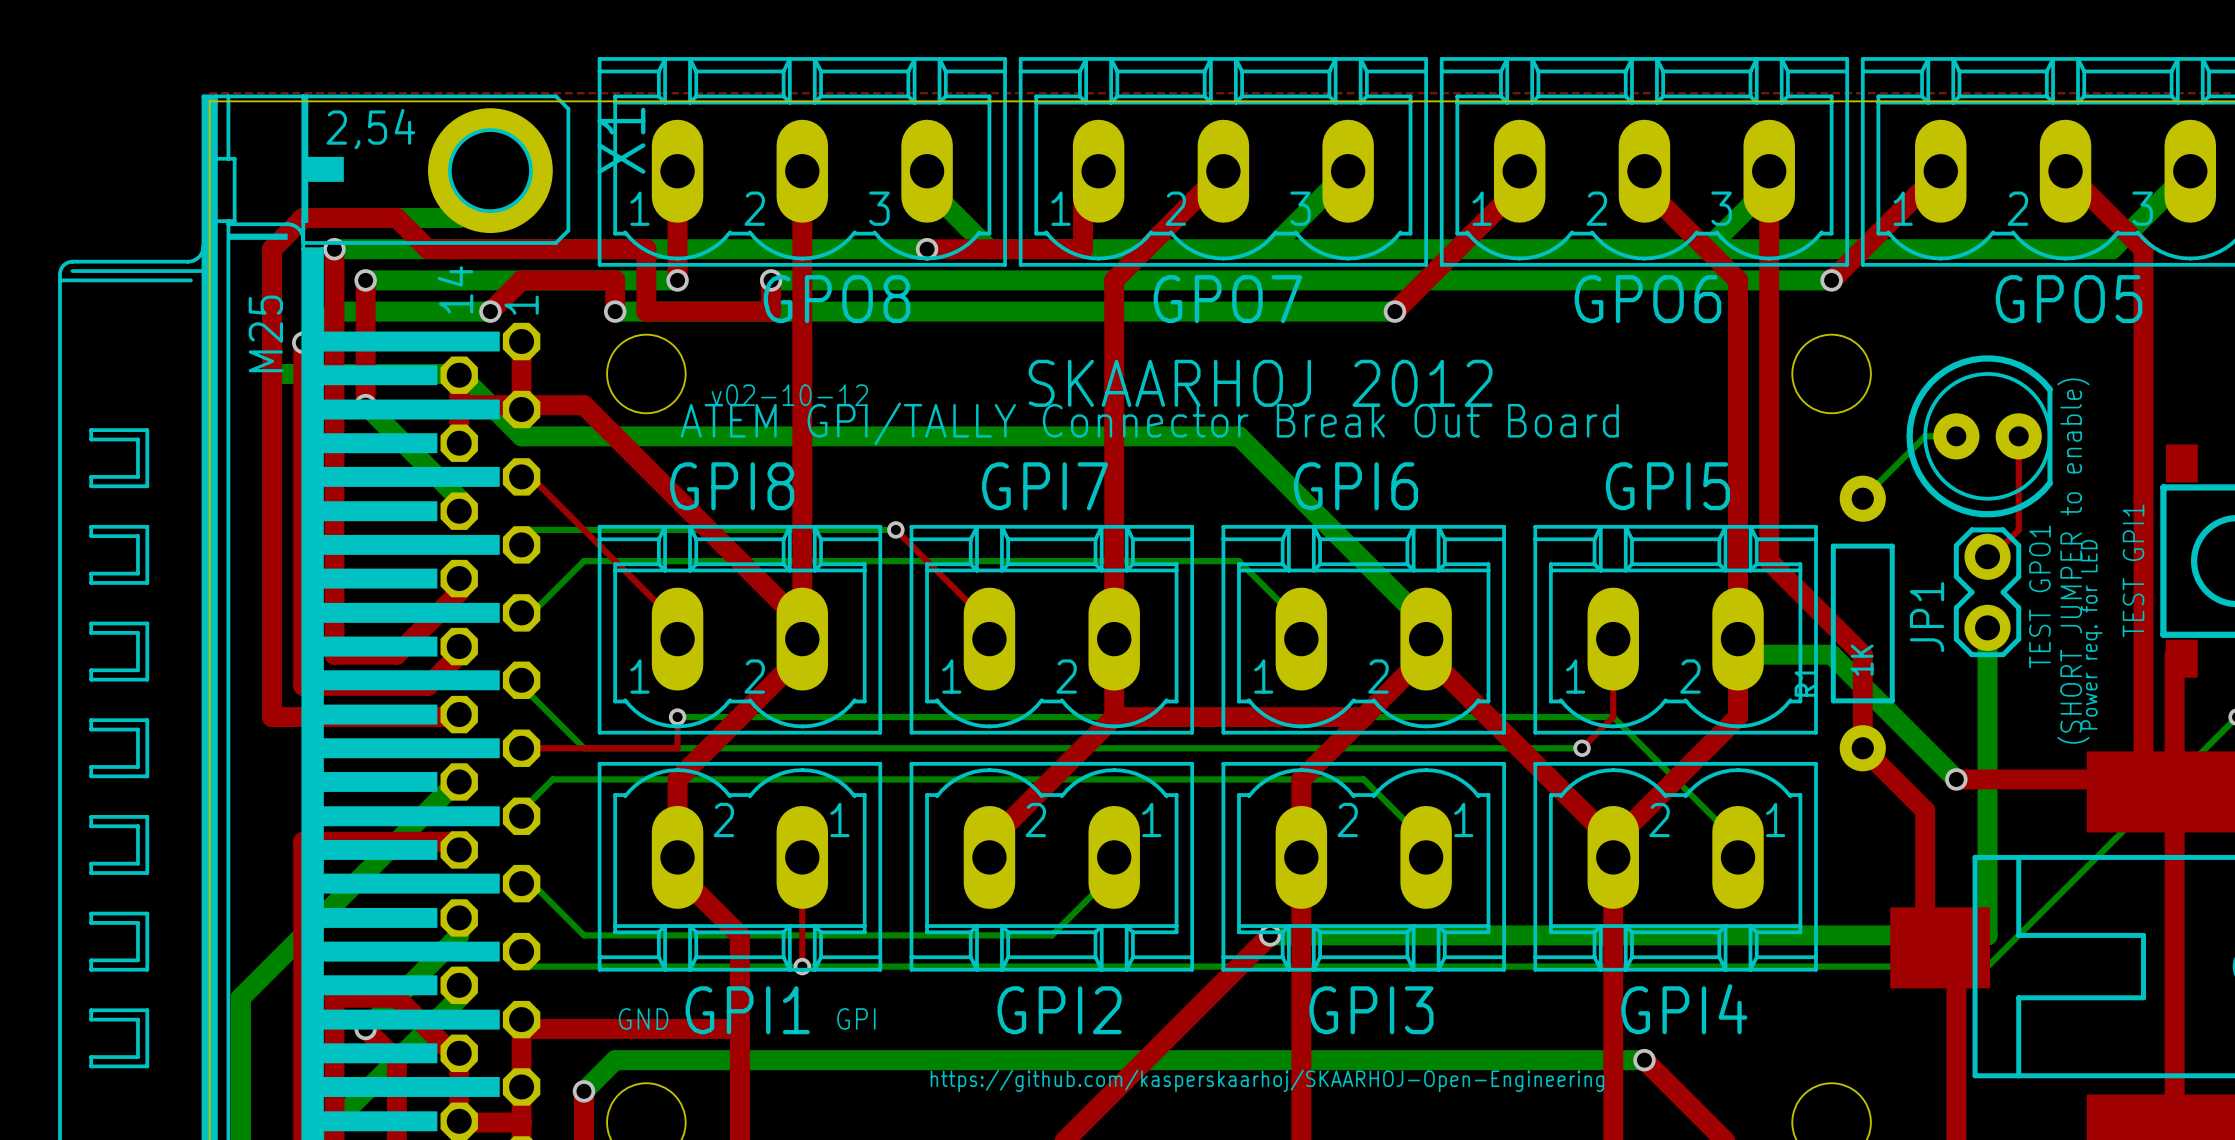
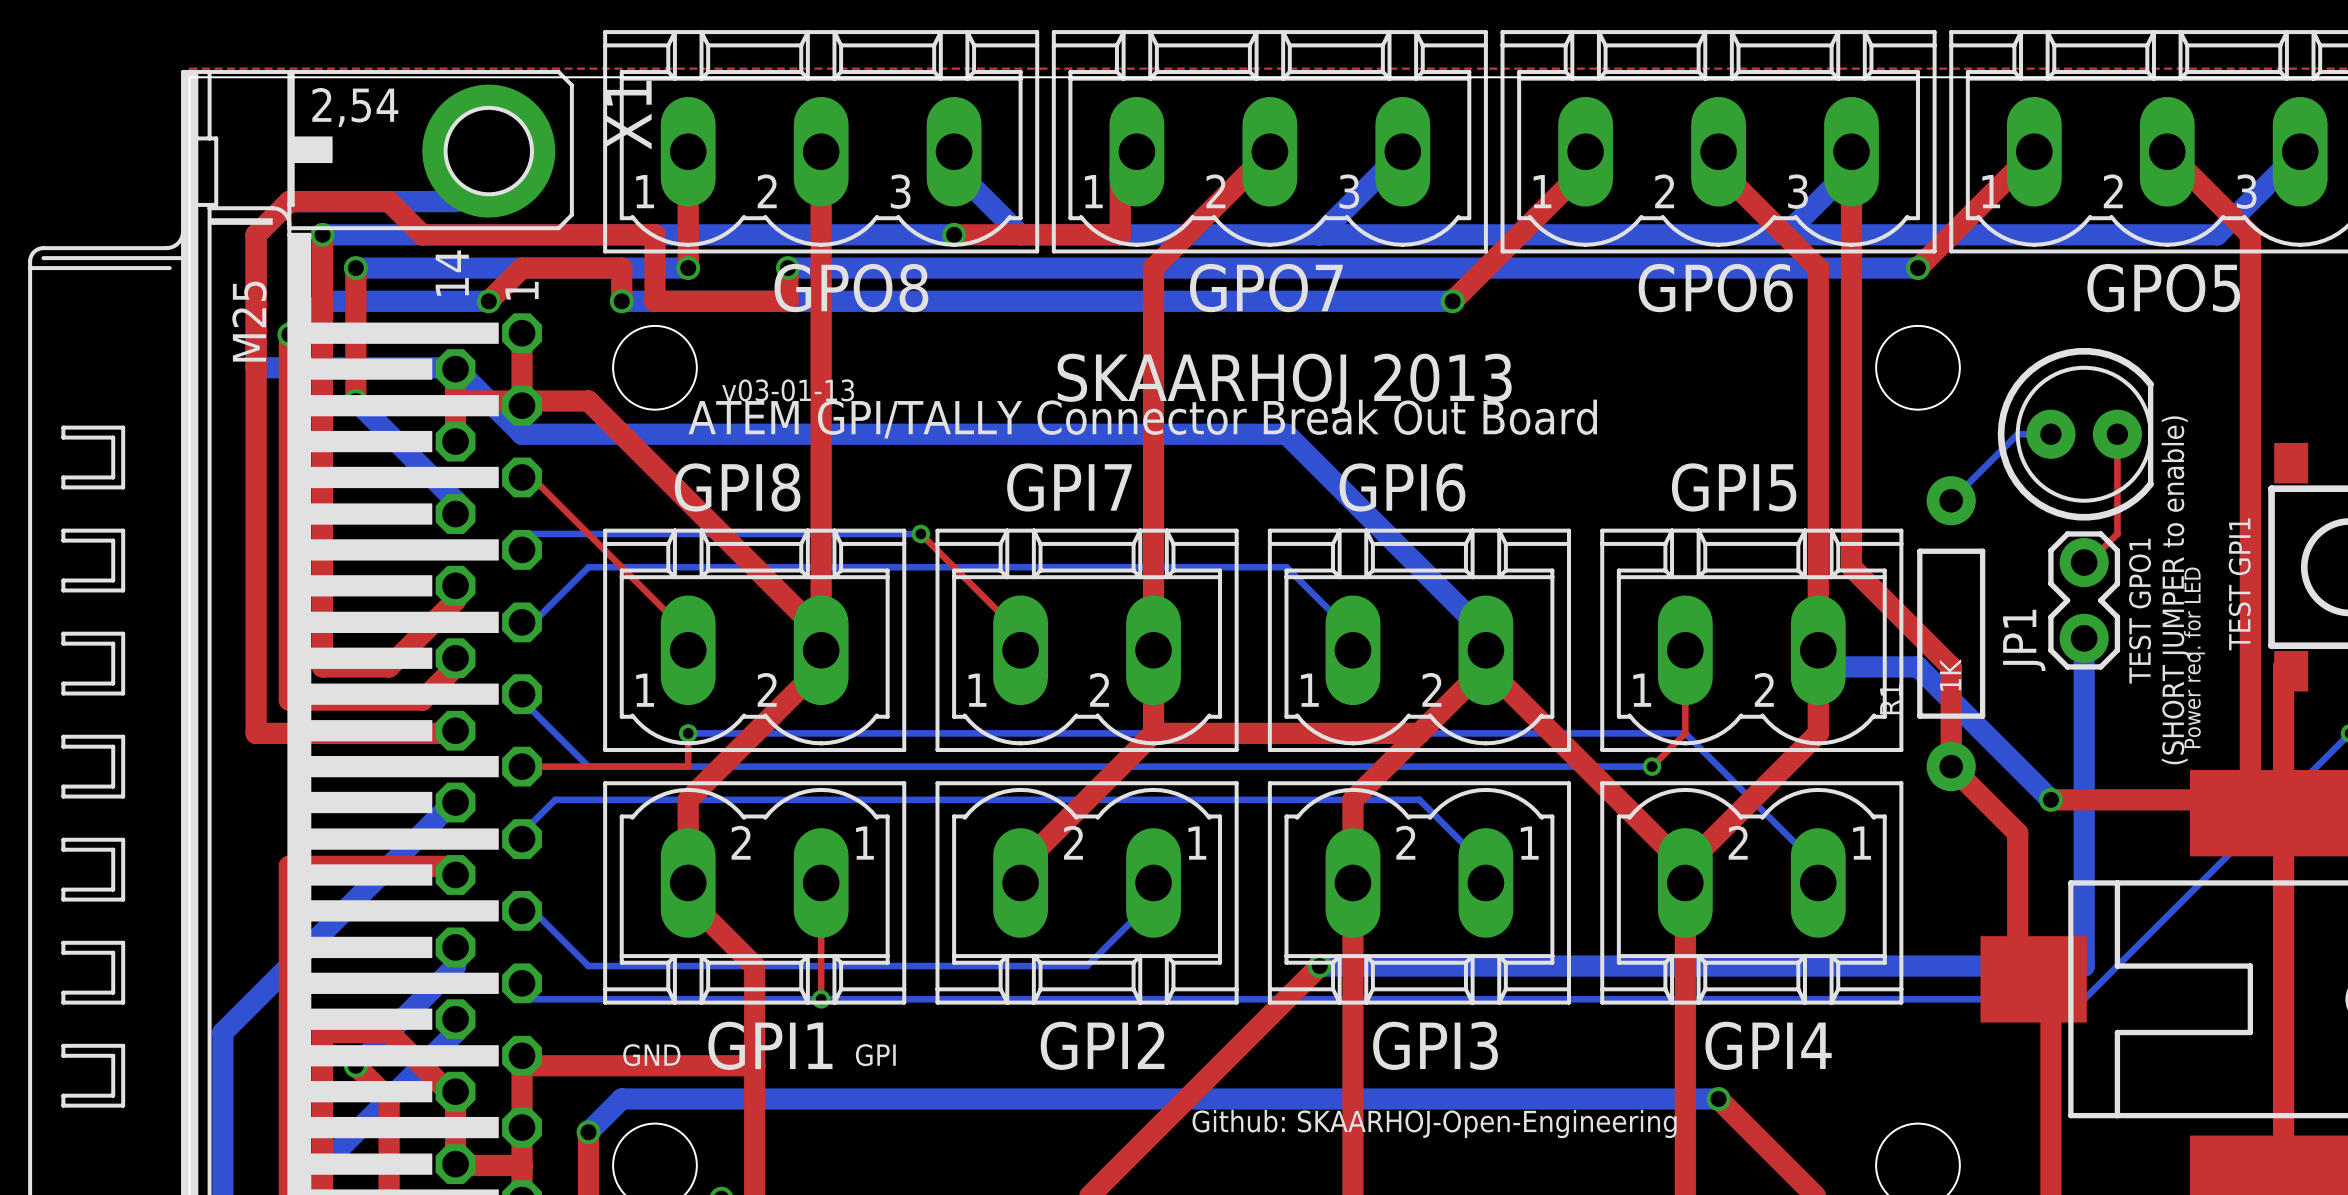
text: SKAARHOJ 2012 (1260, 383) -> SKAARHOJ 2013 (1284, 383)
text: v02-10-12 (789, 395) -> v03-01-13 (788, 390)
text: https://github.com/kasperskaarhoj/SKAARHOJ-Open-Engineering (1267, 1080) -> Github: SKAARHOJ-Open-Engineering (1434, 1124)

